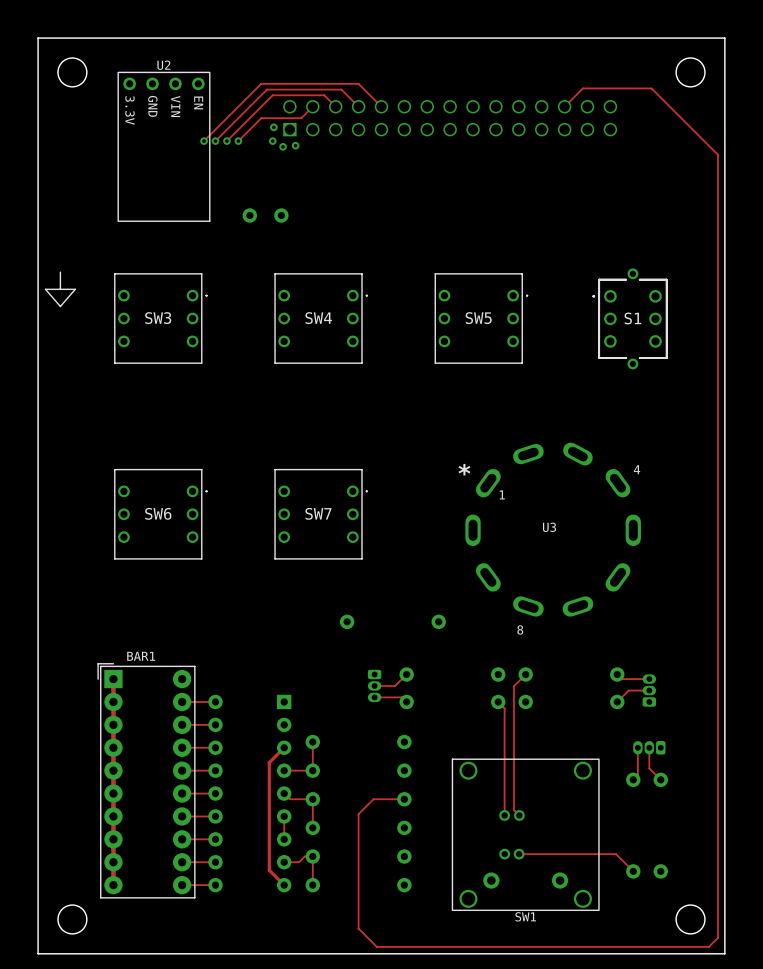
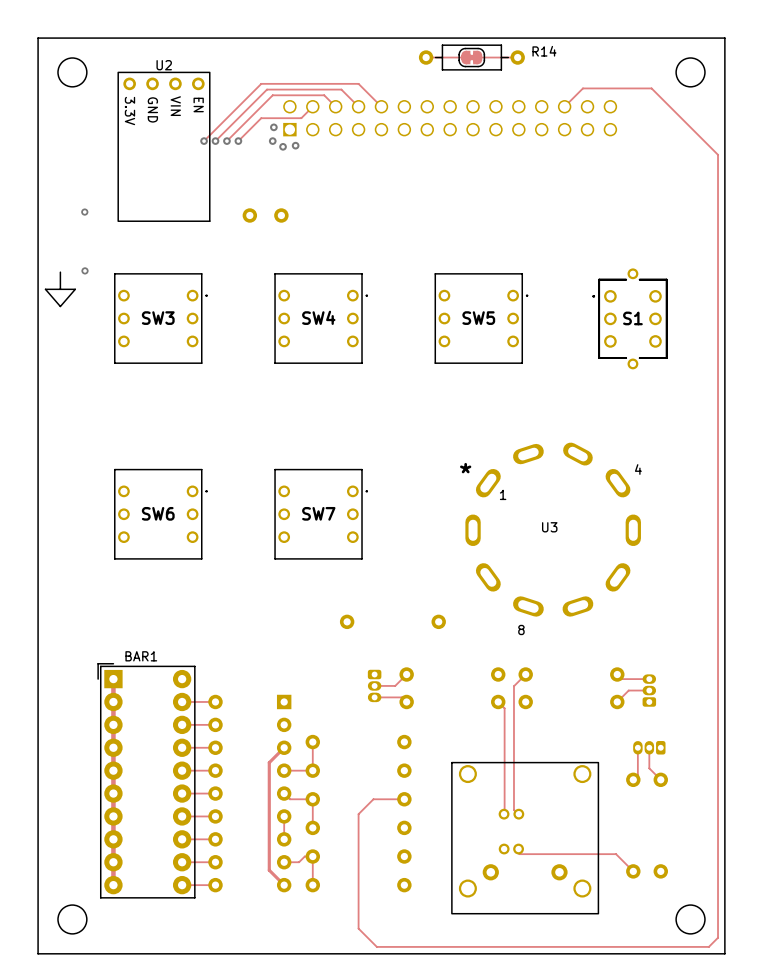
track: none -> (426, 57) (465, 57)
part: none -> (471, 57)
R14: none -> (471, 57)
track: none -> (477, 57) (517, 57)
via: none -> (84, 212)
via: none -> (85, 270)
SW1: (525, 834) -> none
part: none -> (525, 838)

